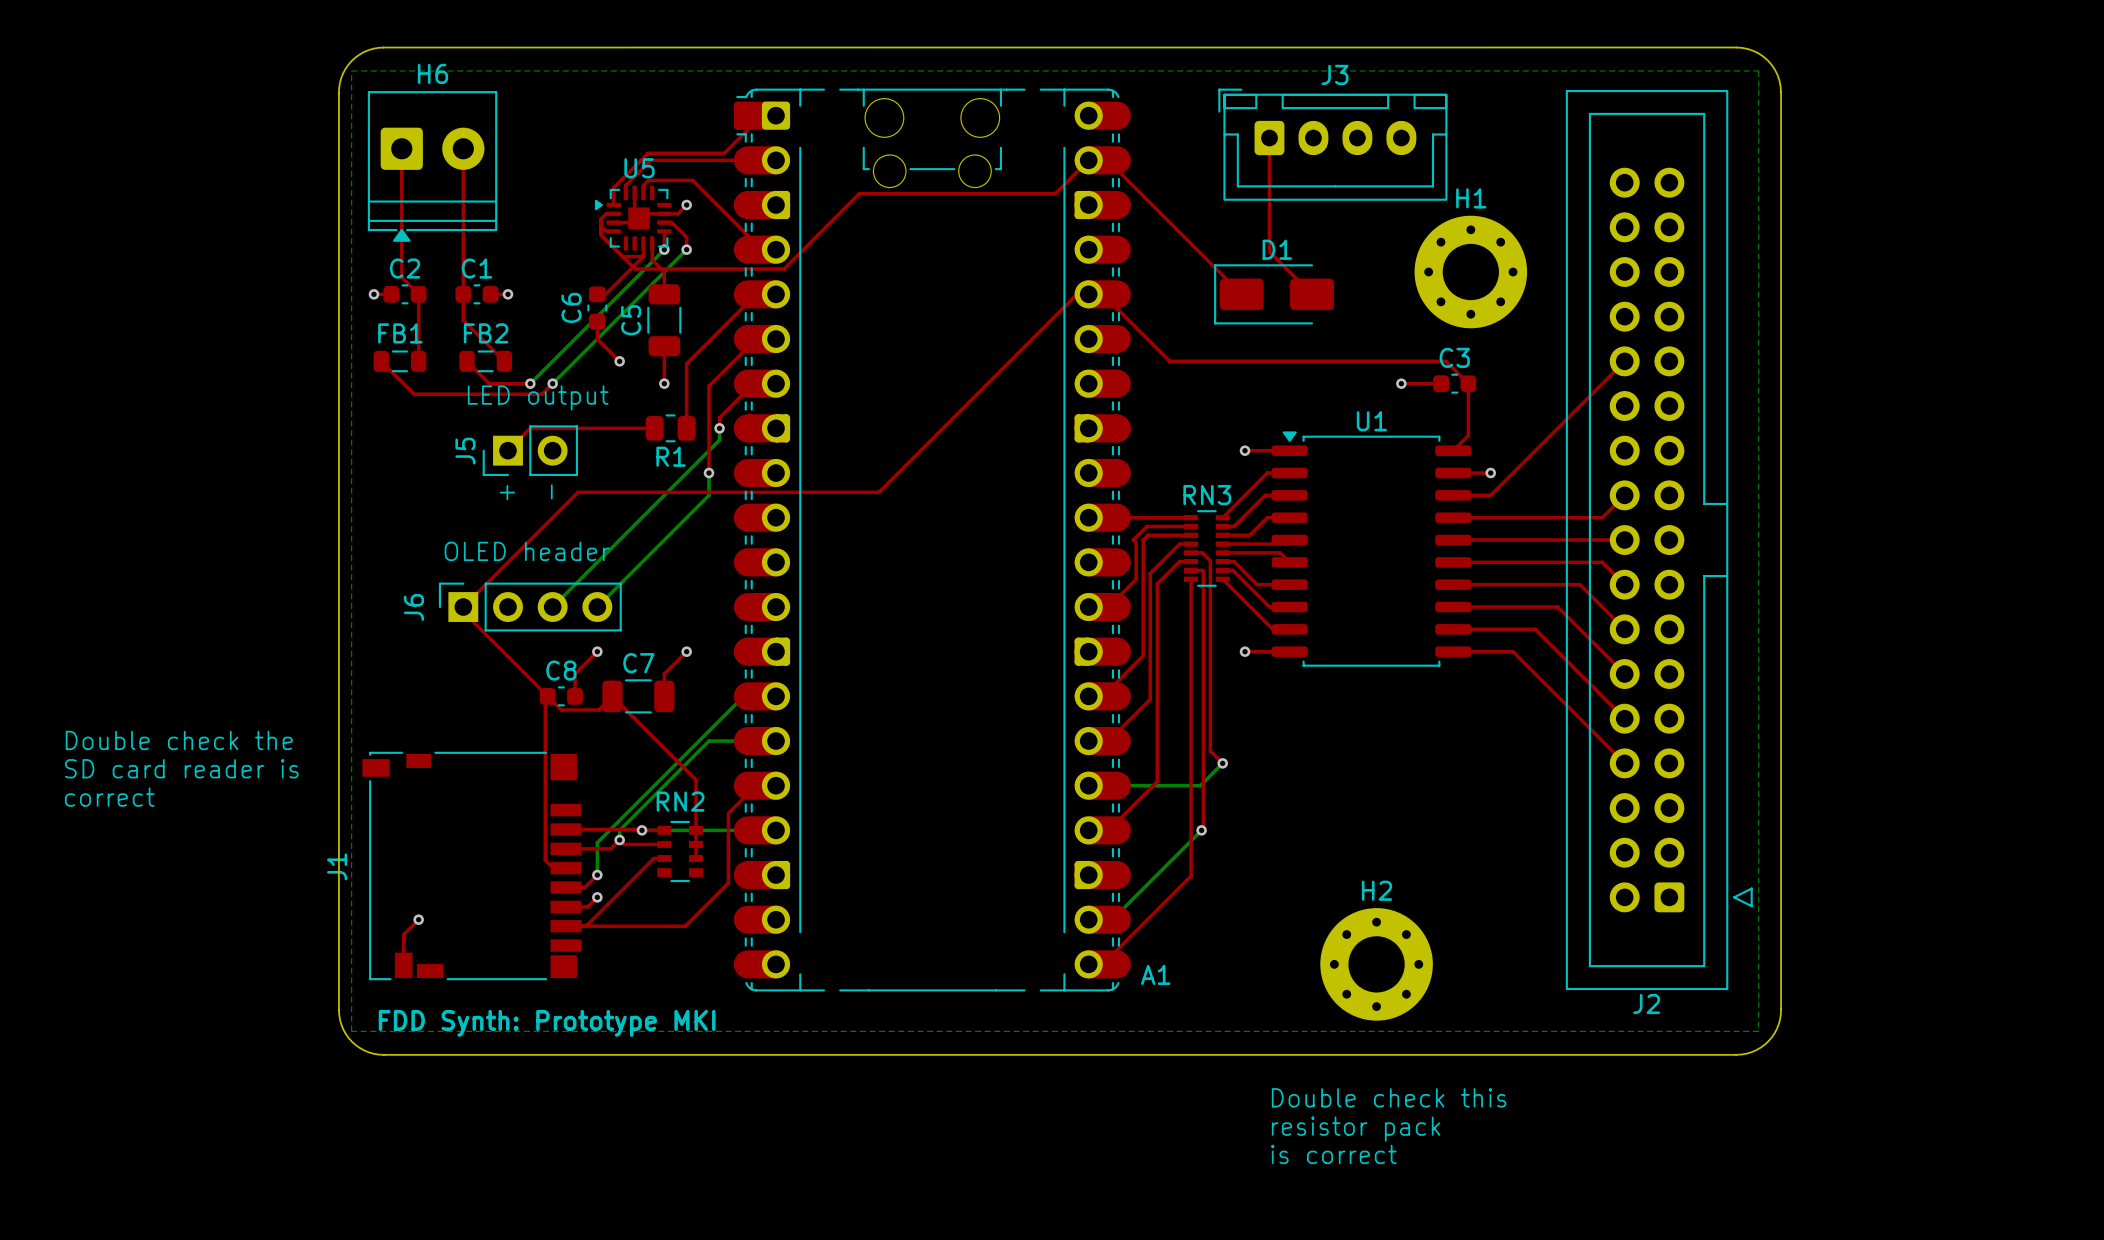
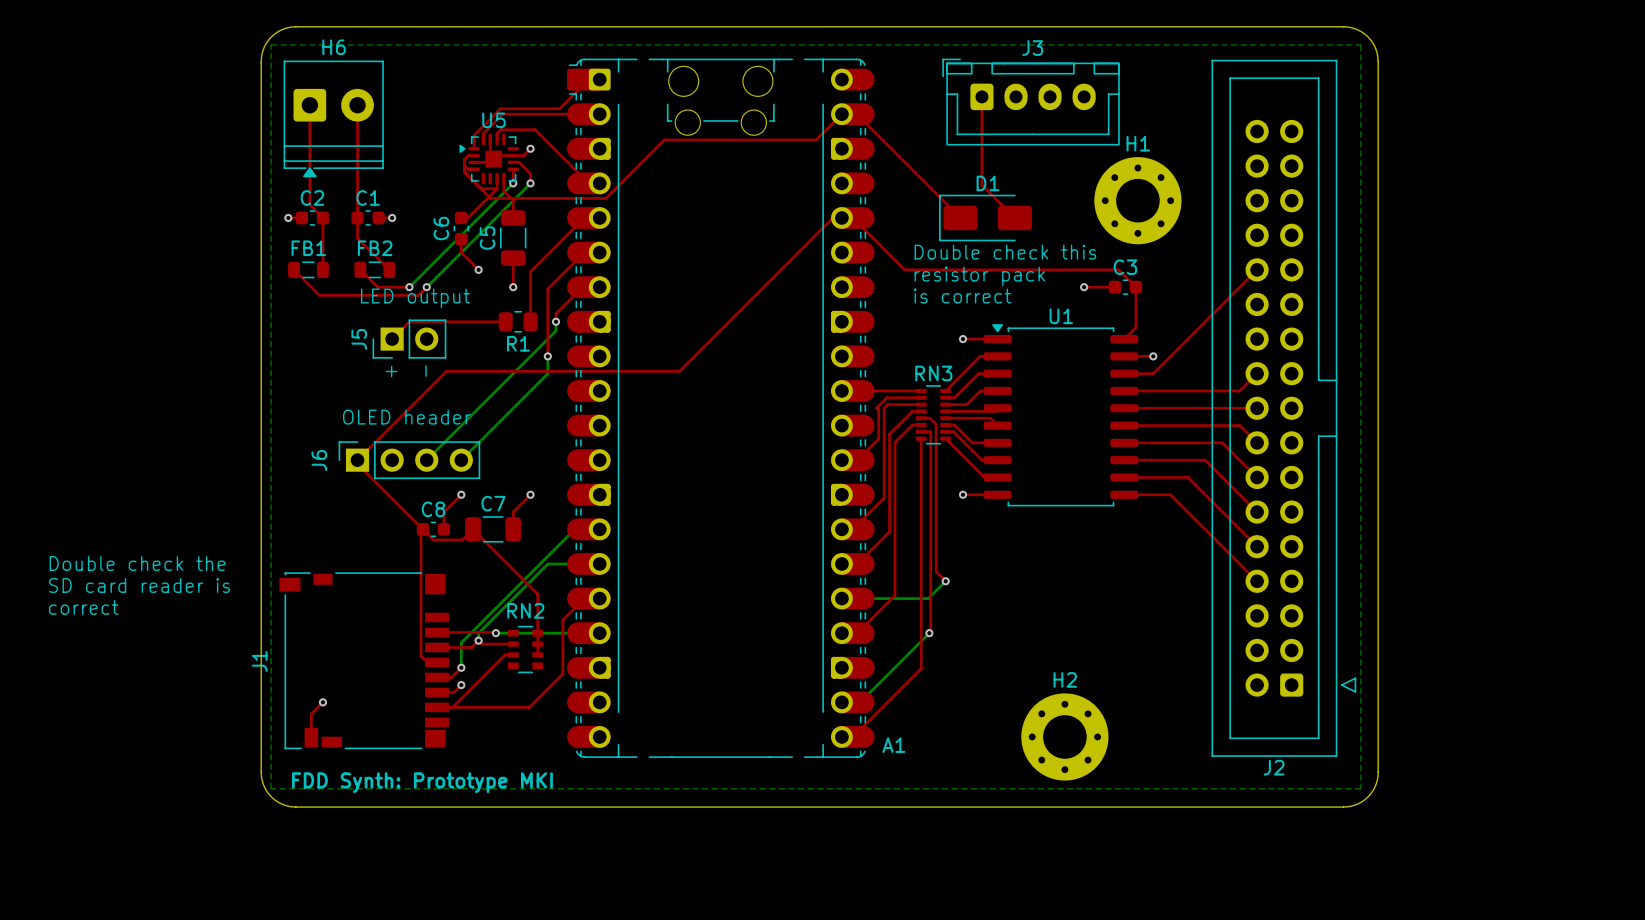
text: none -> Double check this (1005, 252)
text: none -> resistor pack (979, 276)
text: none -> is correct (962, 296)
top track: (642, 830) (664, 830) -> none
text: Double check this (1389, 1097) -> none
text: resistor pack (1356, 1129) -> none
text: is correct (1333, 1154) -> none

